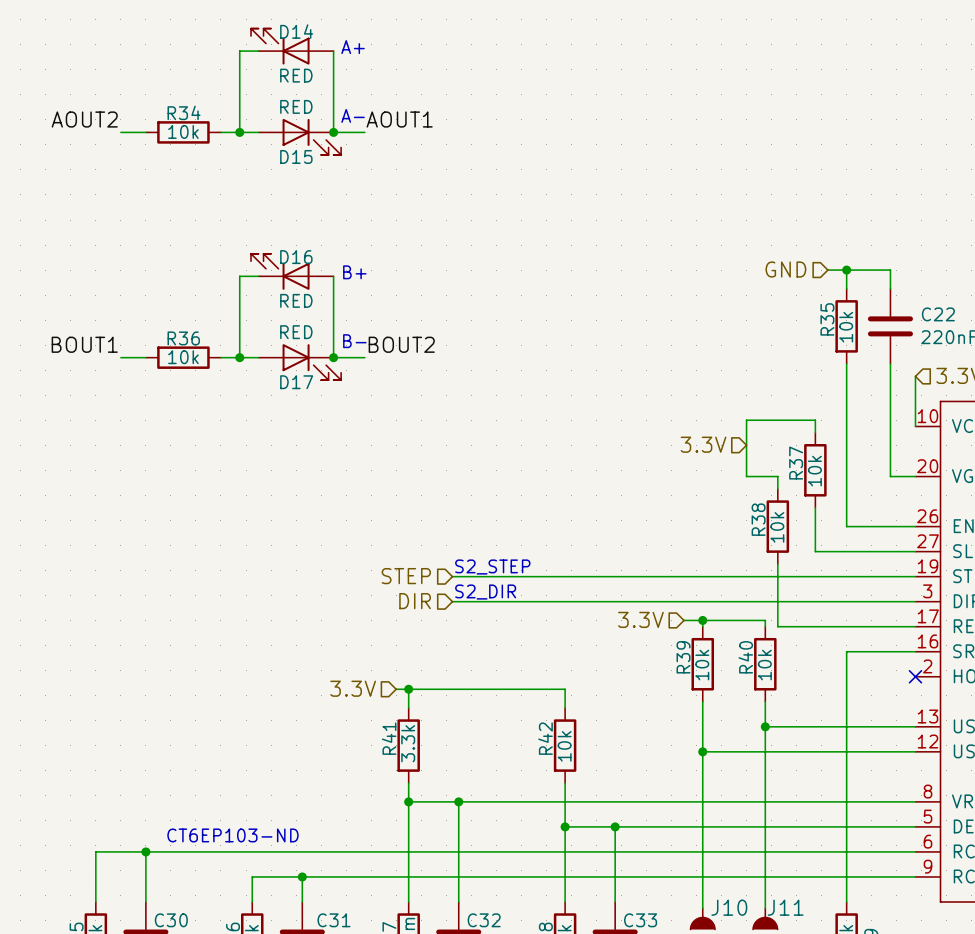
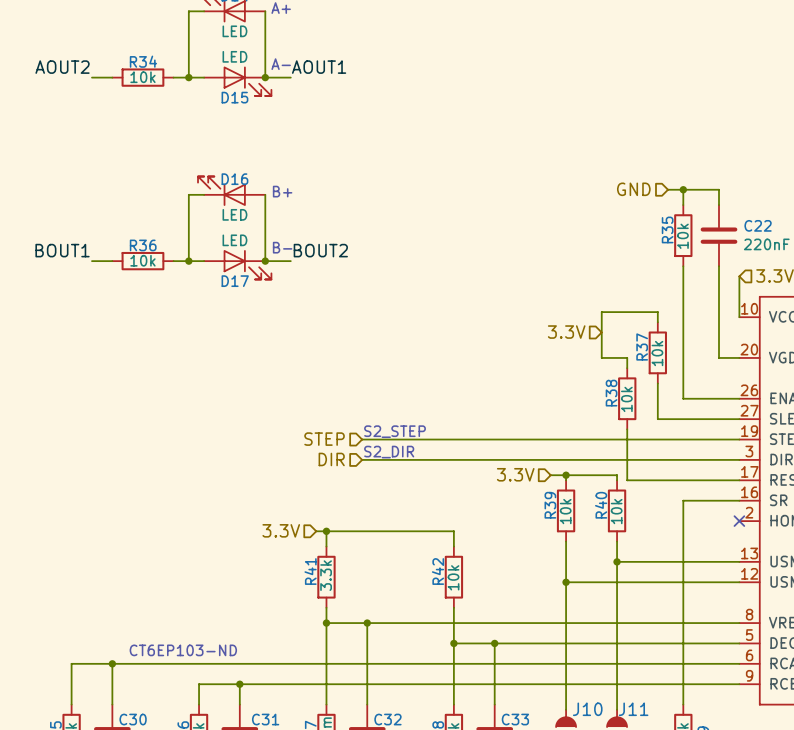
D14 value: RED (296, 75) -> LED (234, 31)
D15 value: RED (296, 106) -> LED (234, 56)
D16 value: RED (296, 300) -> LED (234, 214)
D17 value: RED (296, 332) -> LED (234, 240)

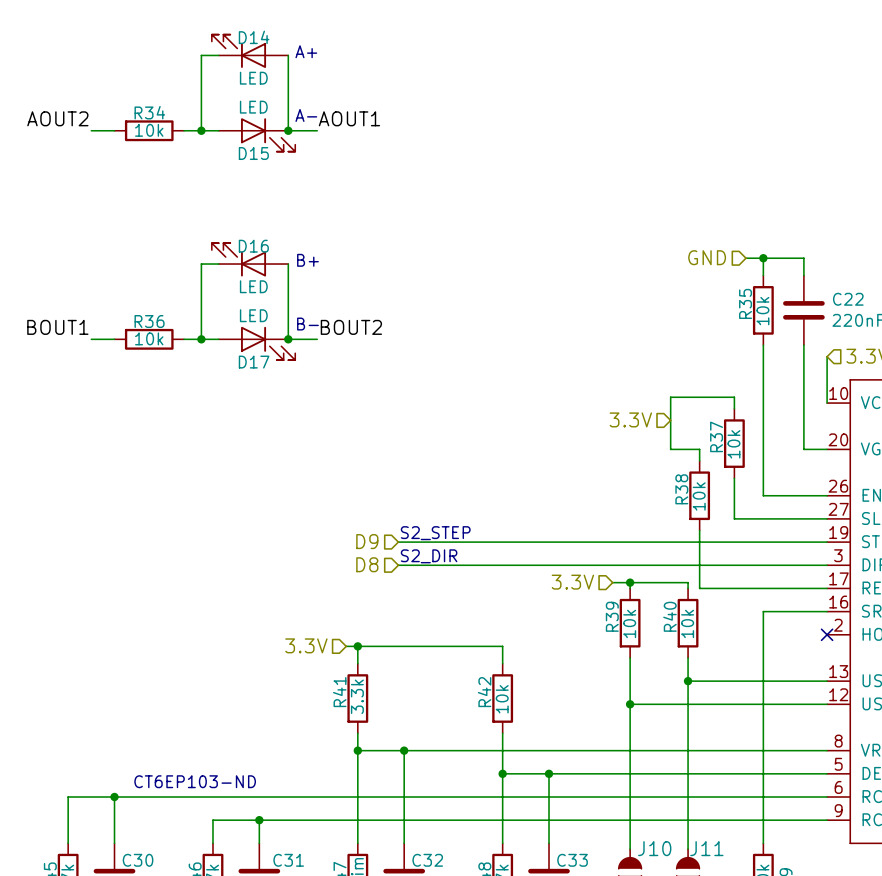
hierarchical label: STEP (324, 439) -> D9 (367, 541)
hierarchical label: DIR (331, 459) -> D8 (367, 564)

